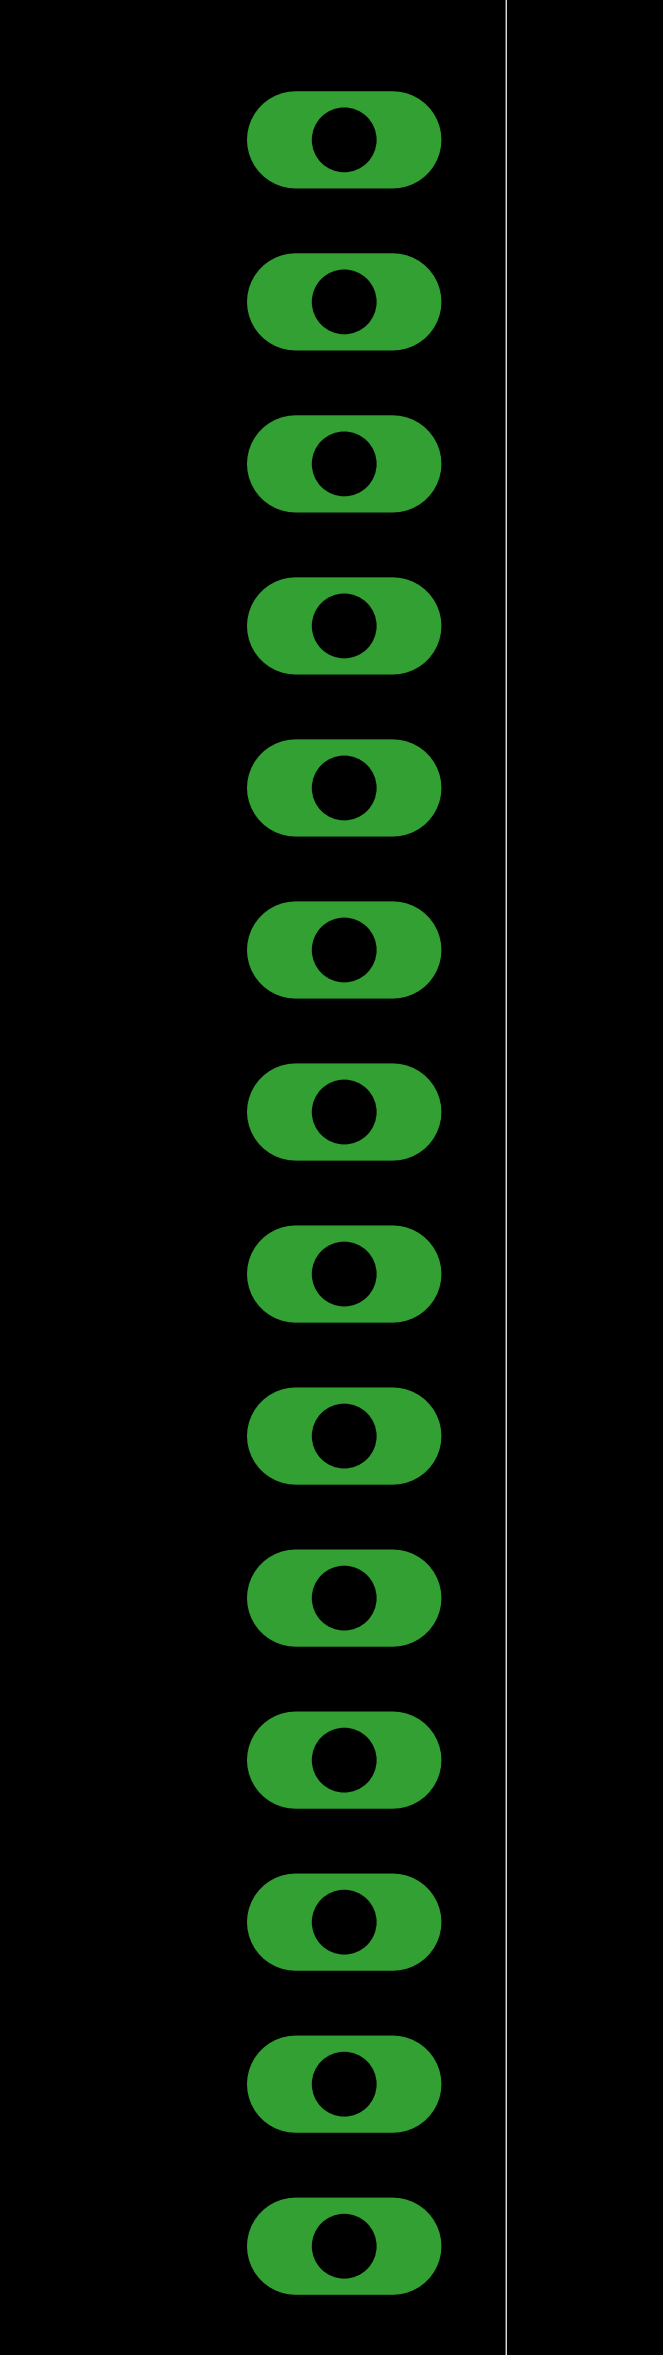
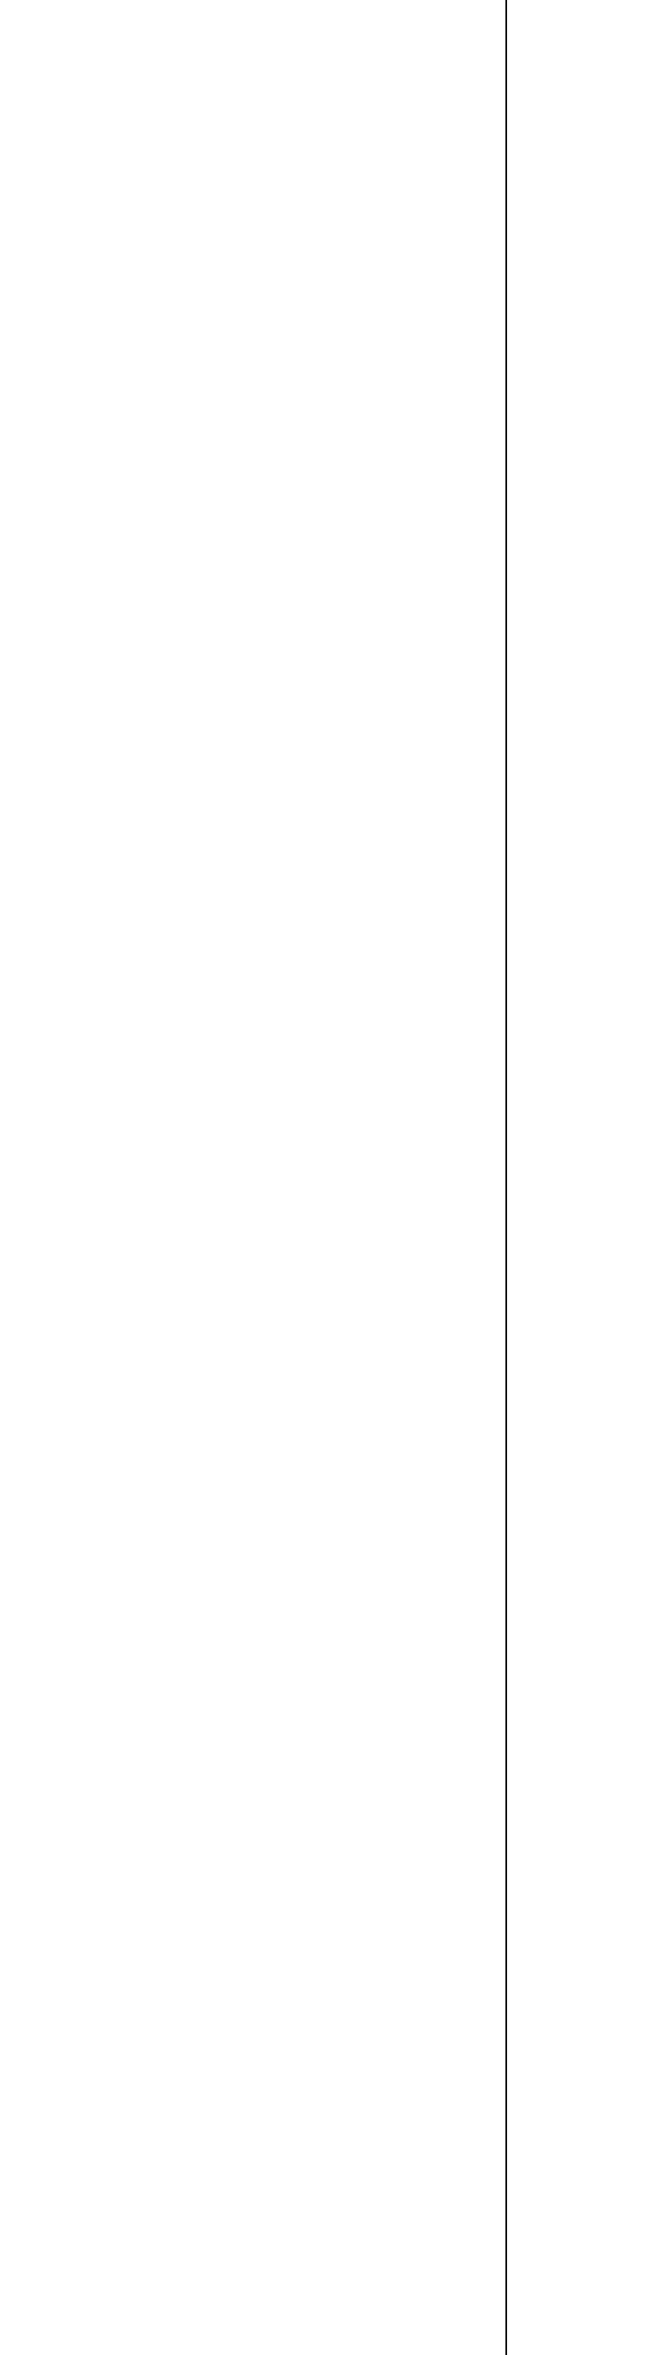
part: (344, 1193) -> none

